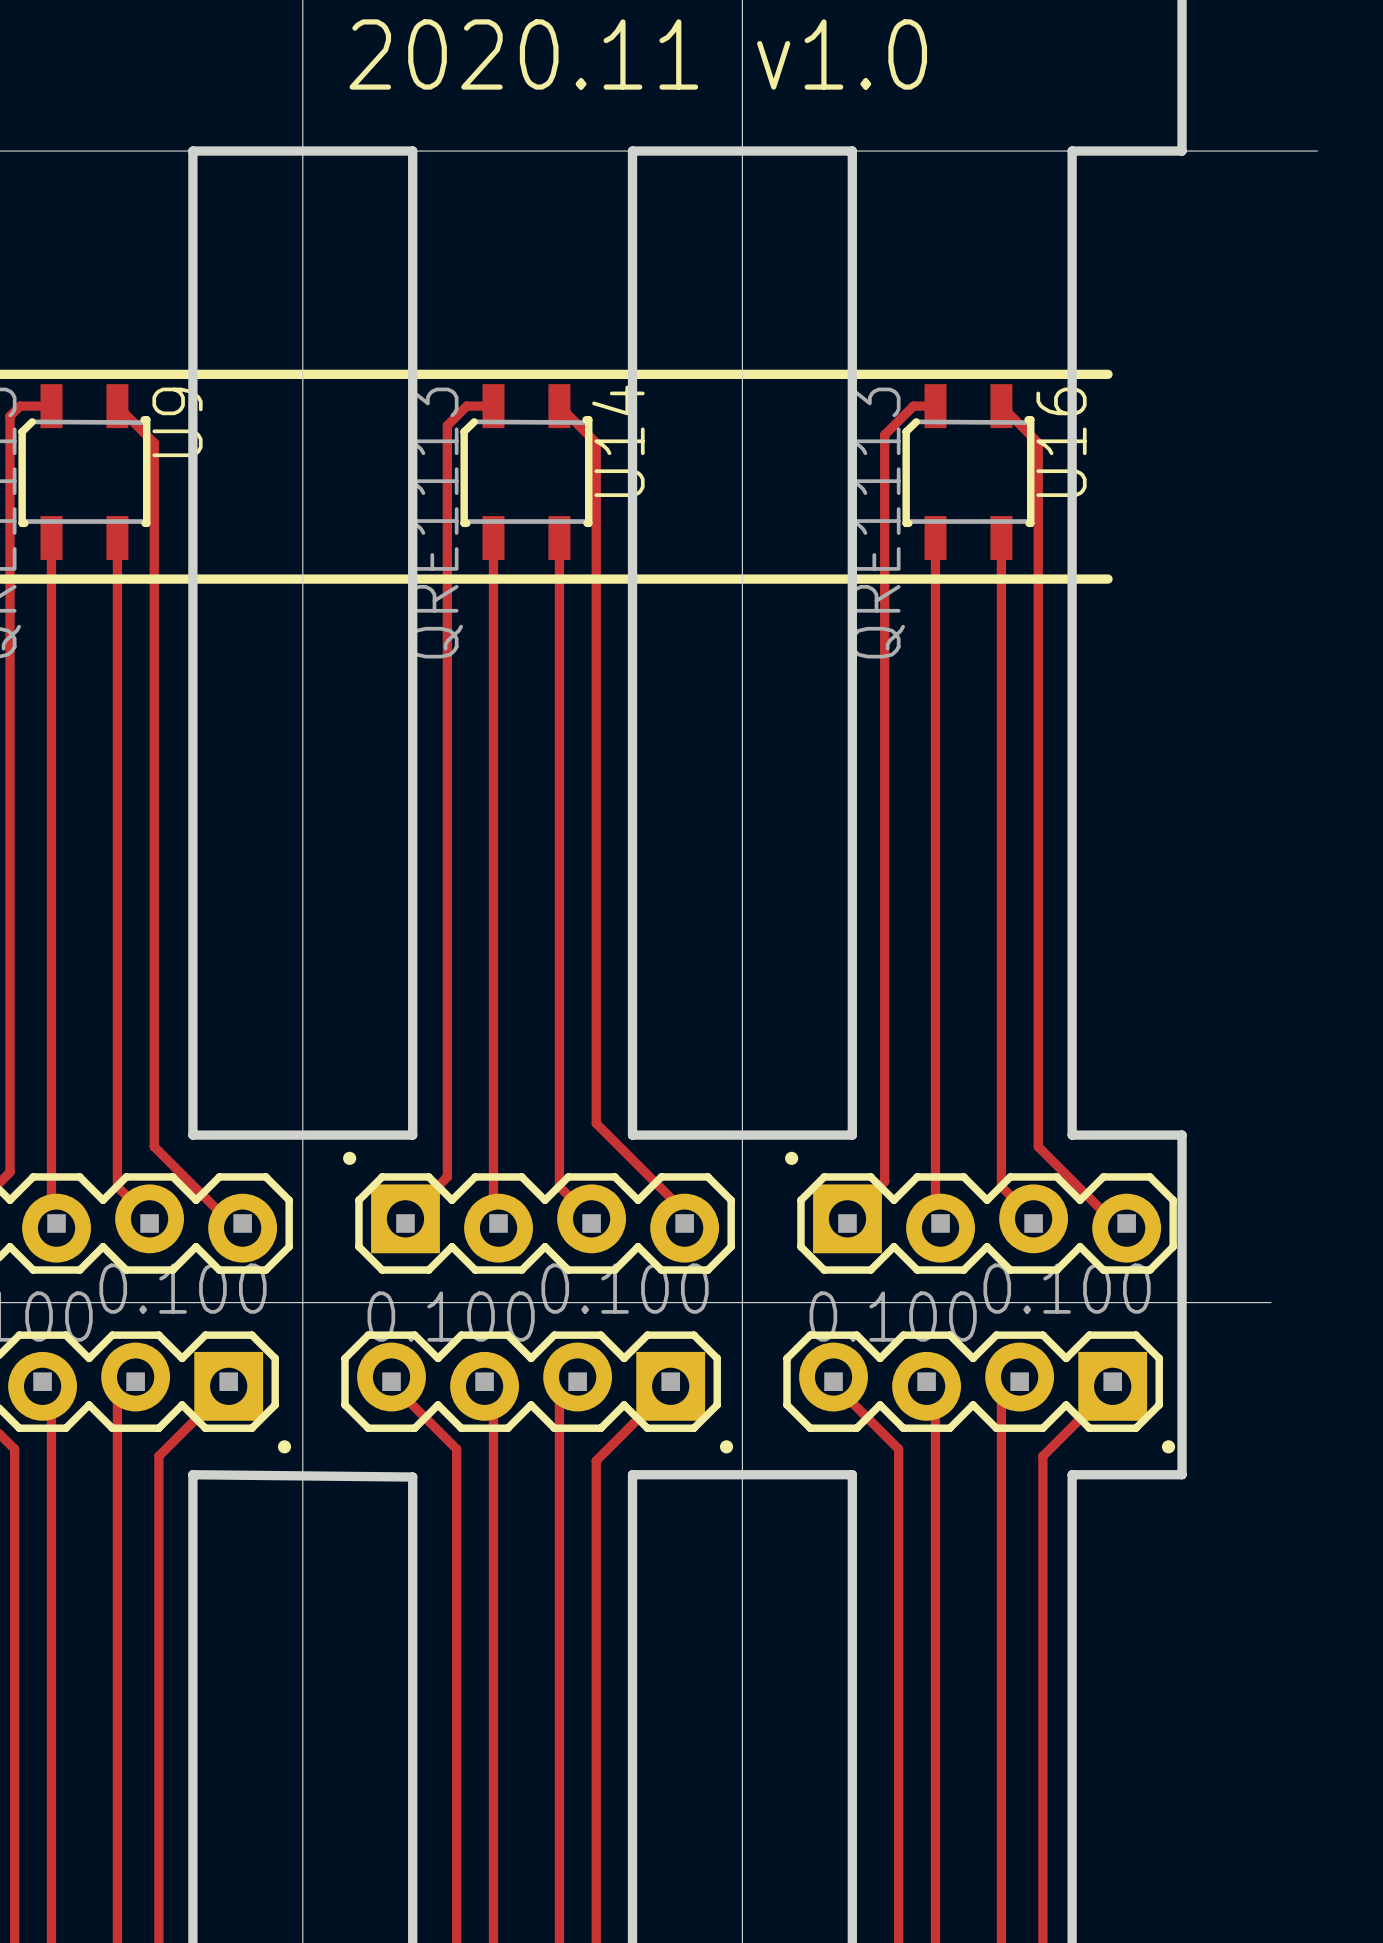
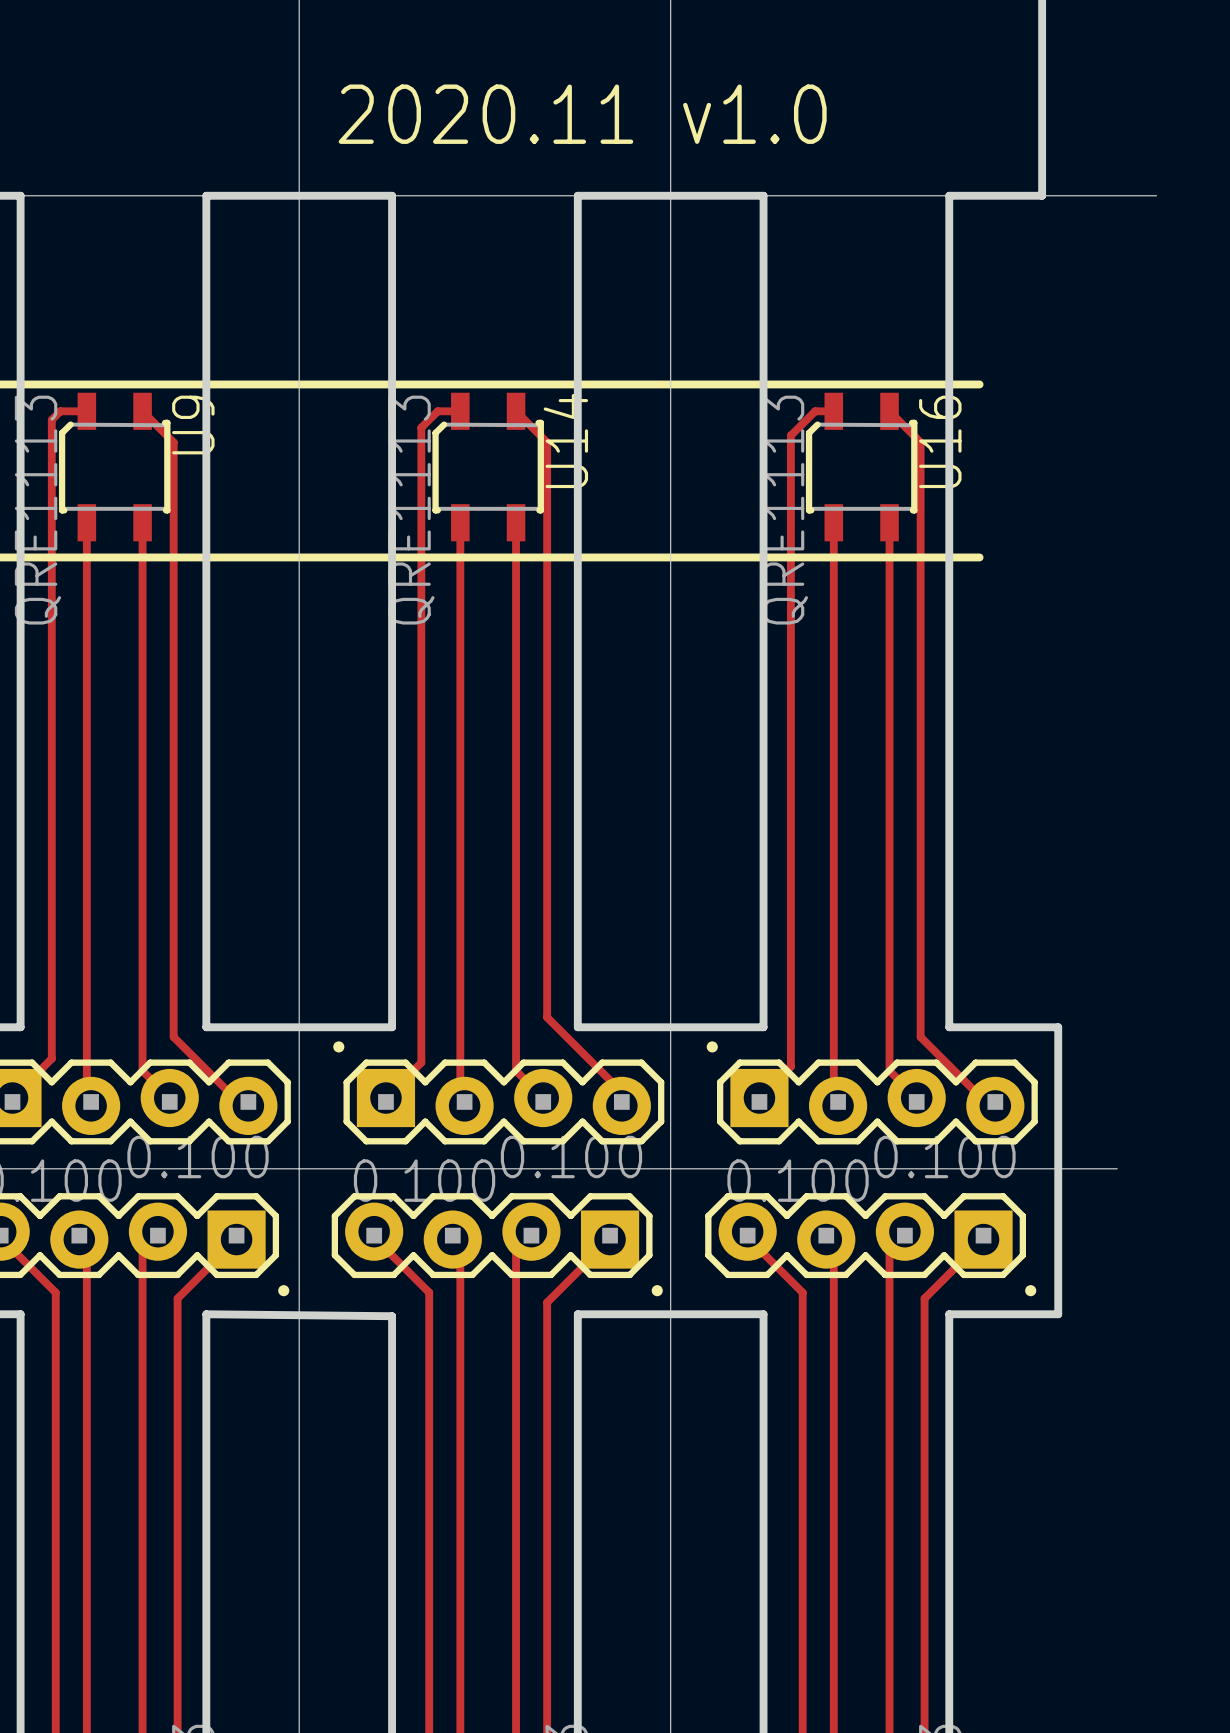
board edge: (1182, 1135) (1182, 1474) -> (1042, 1027) (1058, 1027) (1058, 1314) (1042, 1314)

